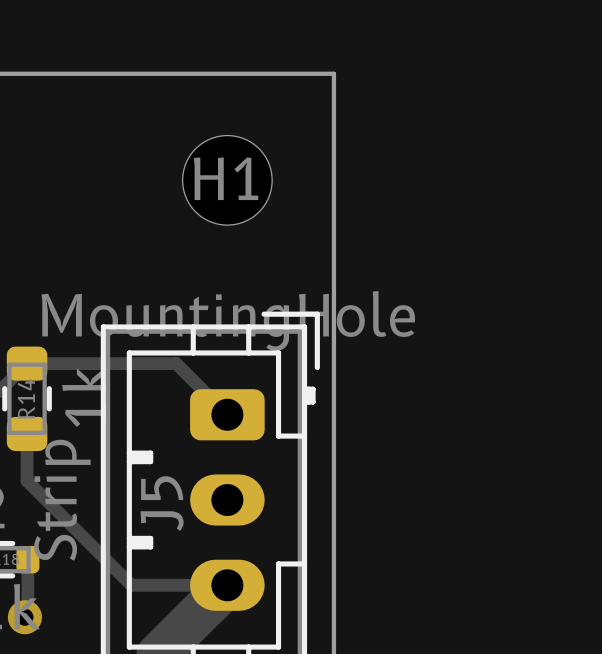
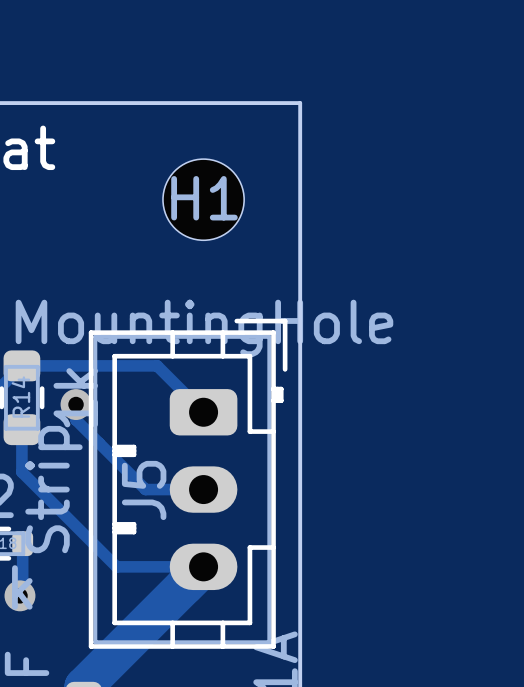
track: none -> (76, 404) (76, 419) (145, 489) (203, 489)
via: none -> (76, 404)

